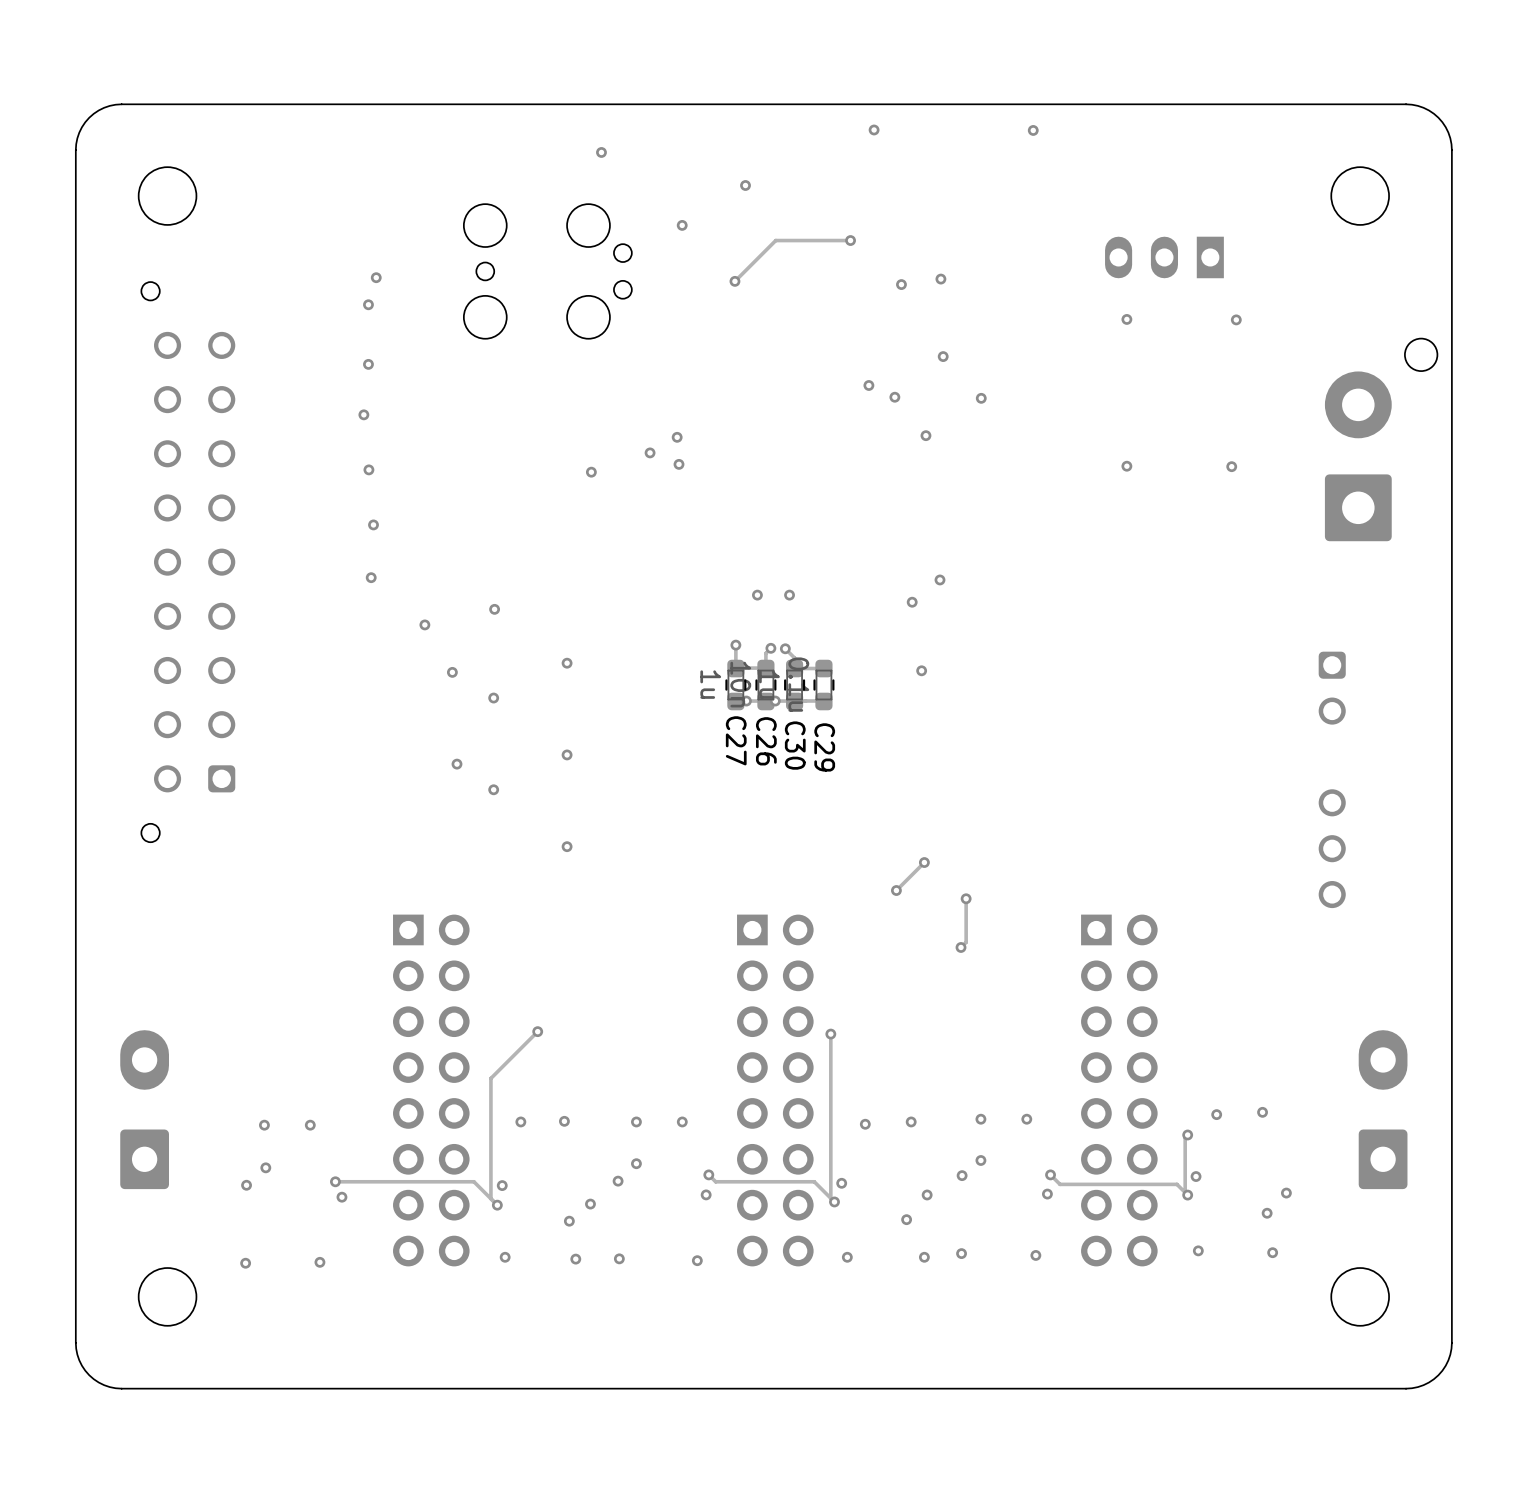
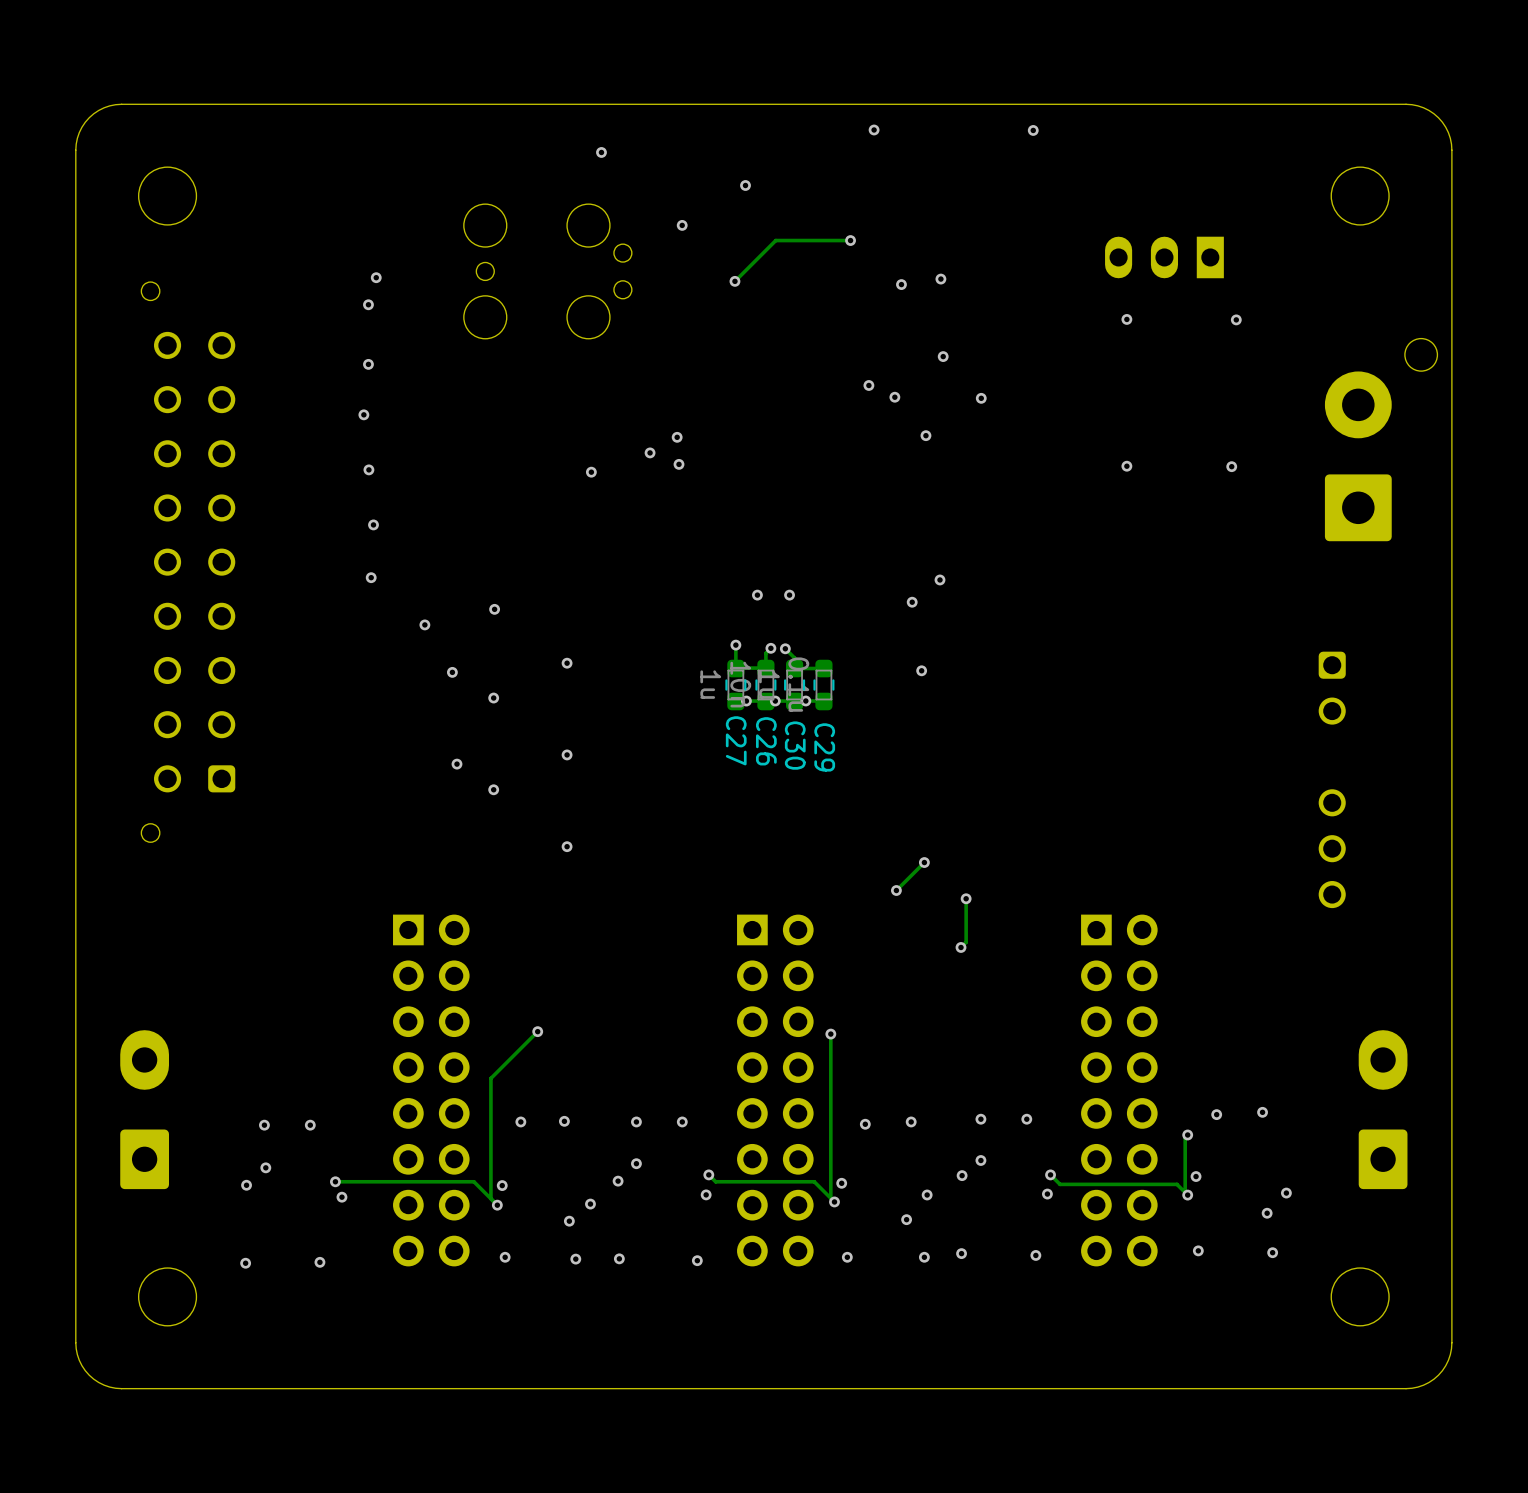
via: none -> (805, 701)

